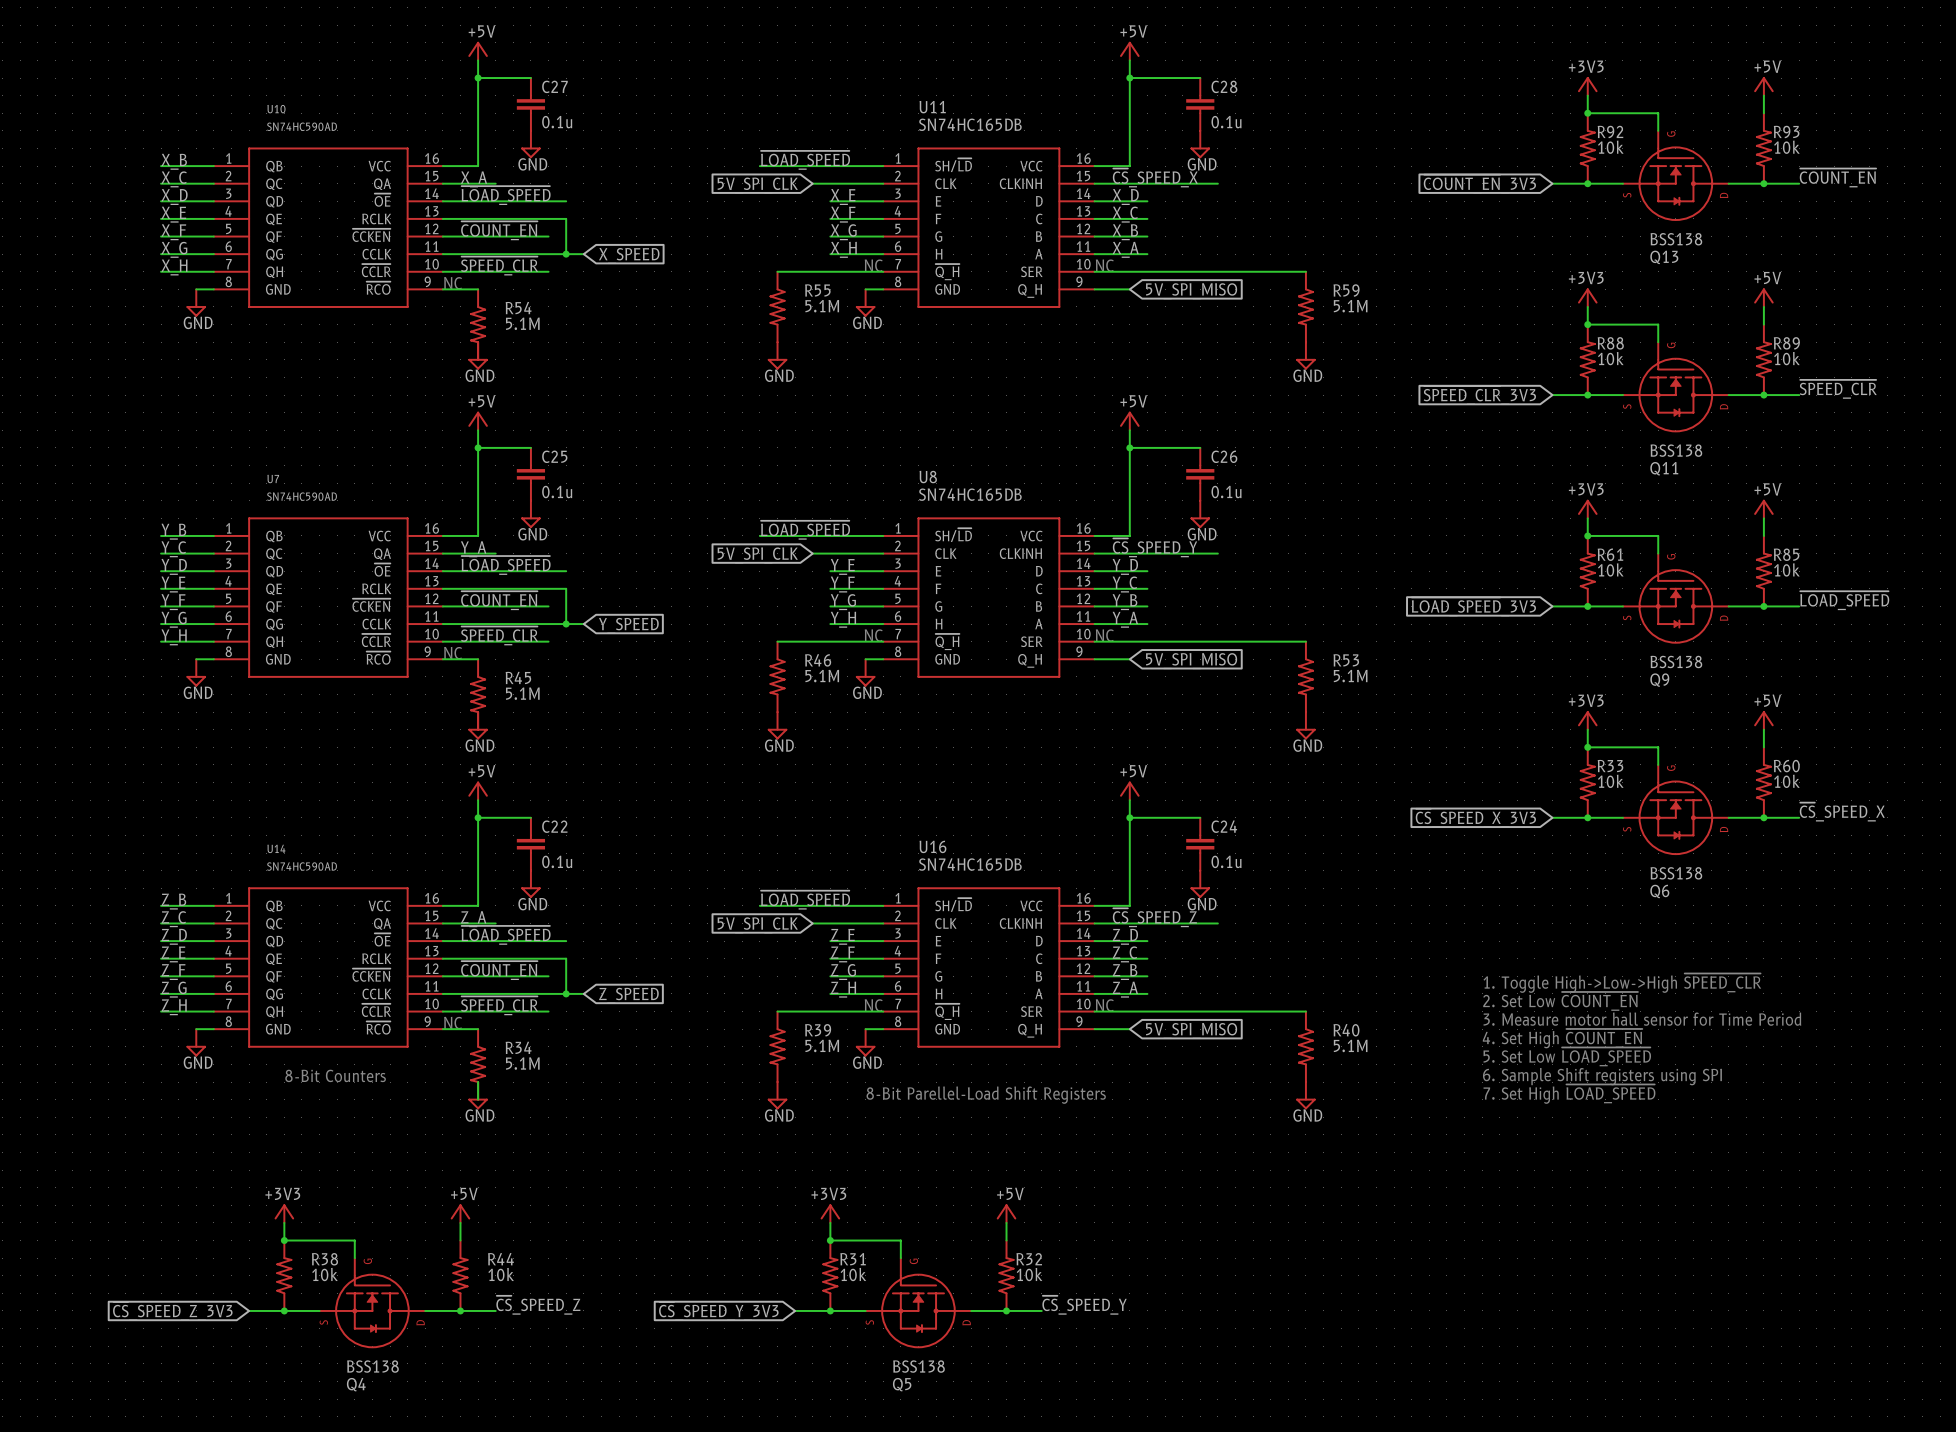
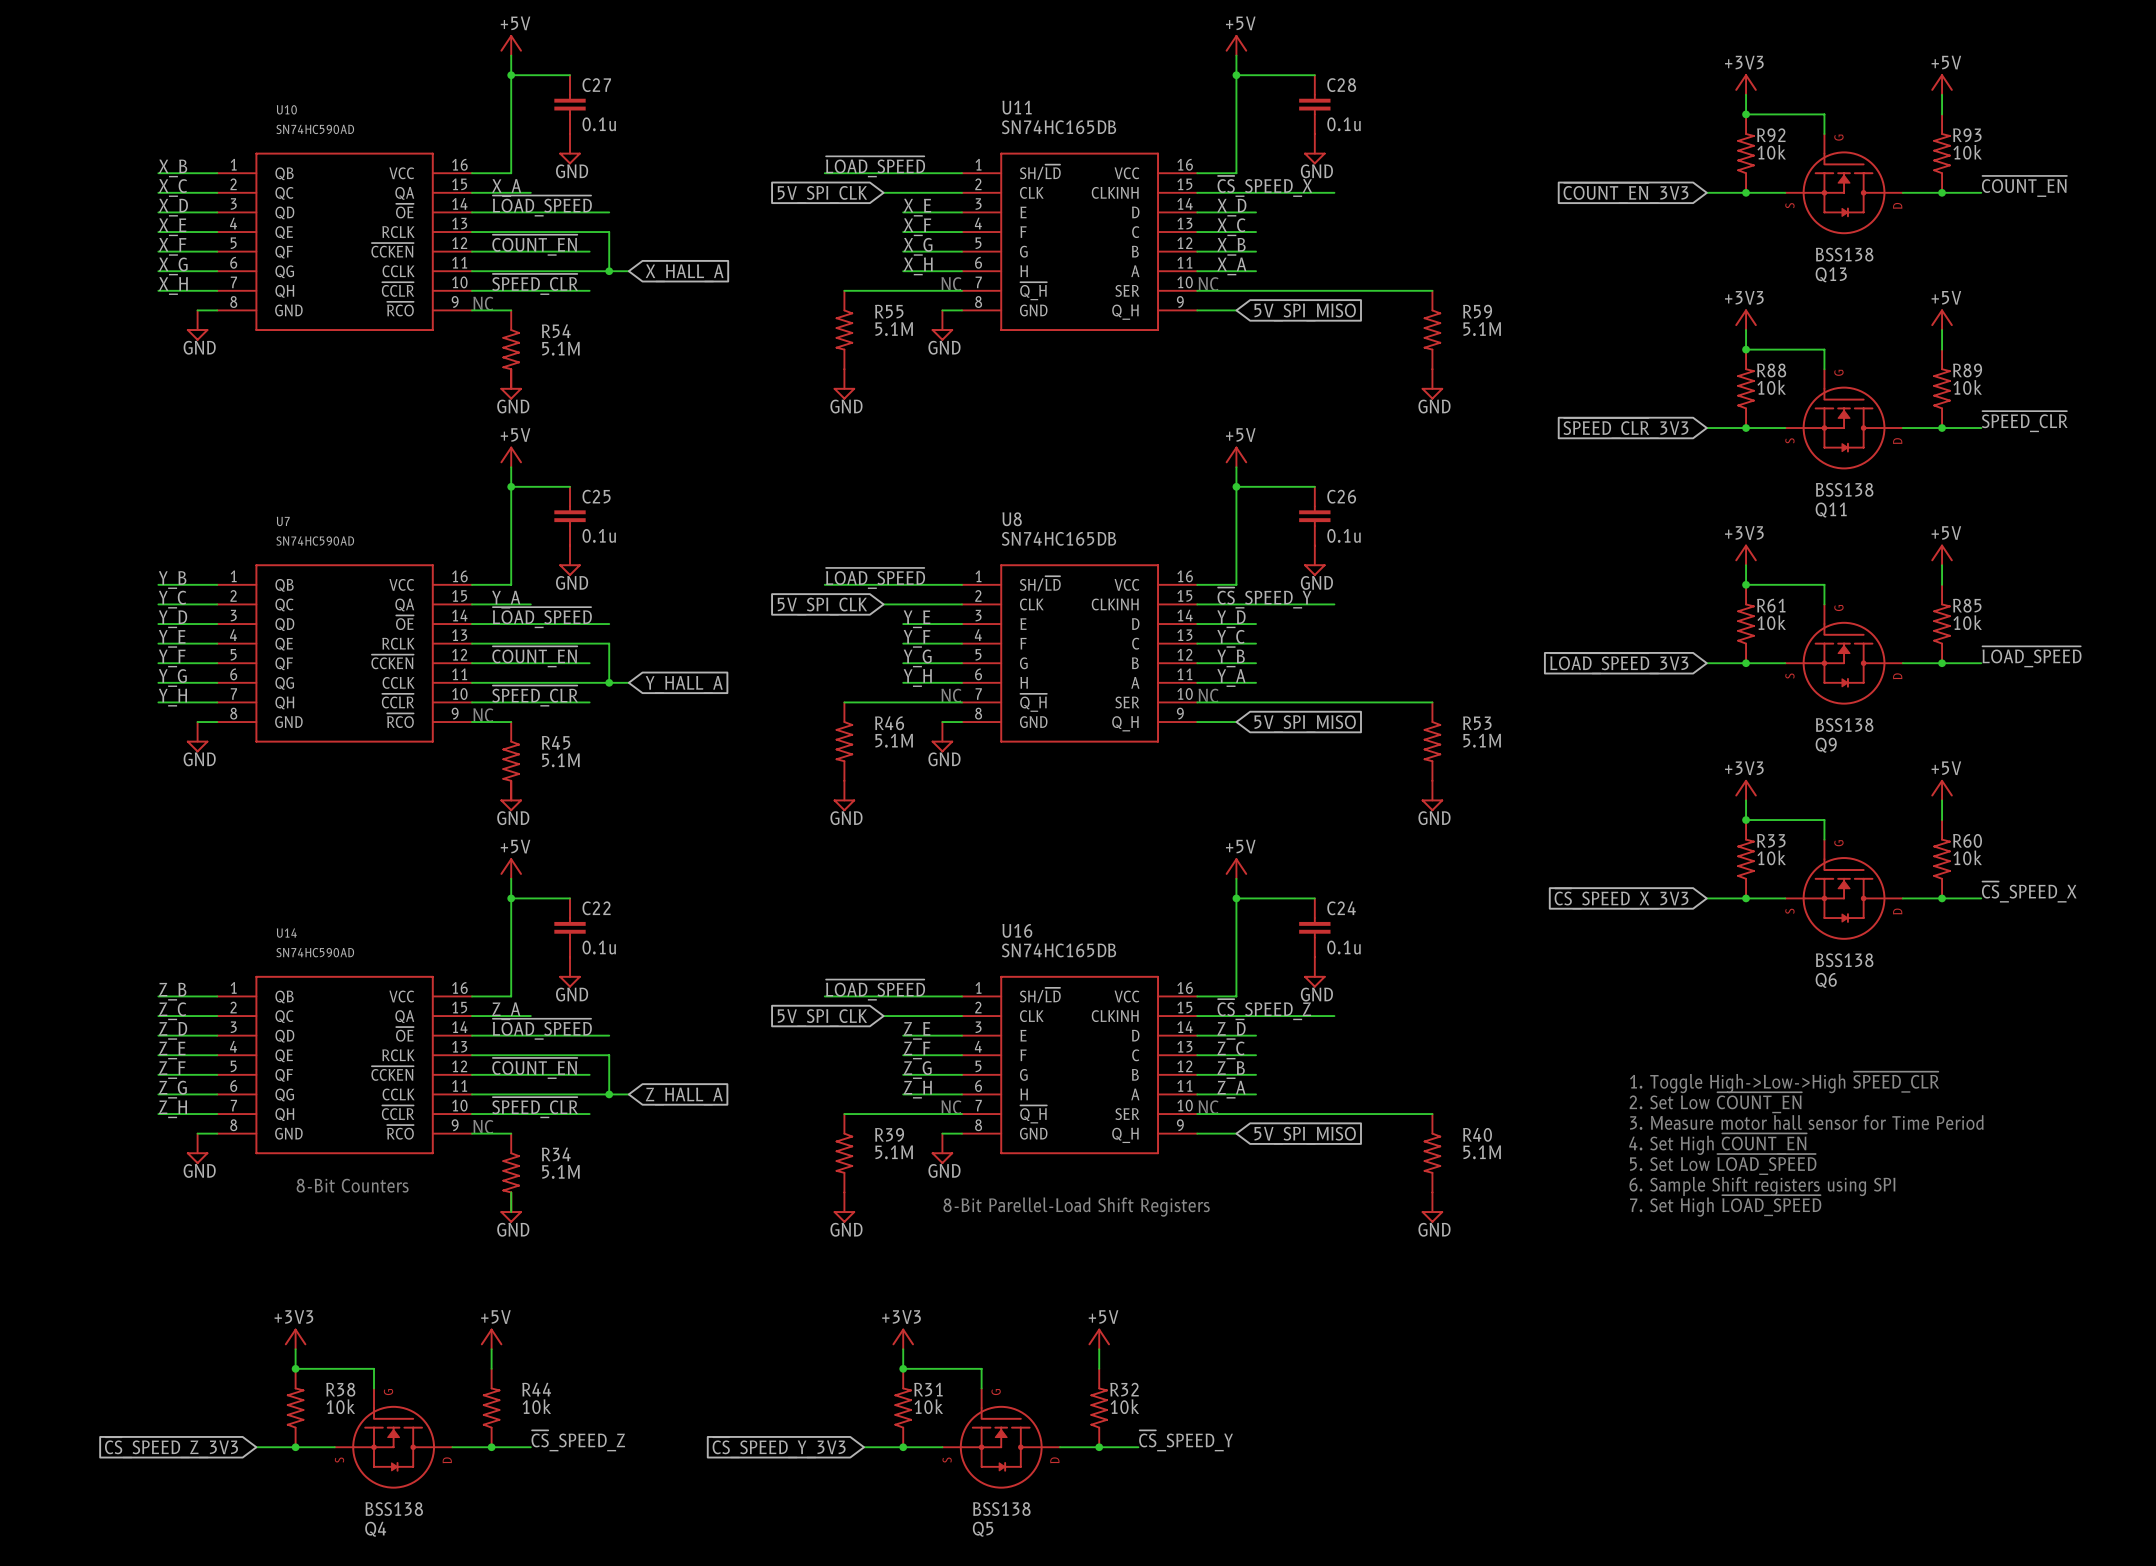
global label: X_SPEED (629, 256) -> X_HALL_A (684, 273)
global label: Y_SPEED (628, 625) -> Y_HALL_A (684, 684)
global label: Z_SPEED (628, 995) -> Z_HALL_A (684, 1096)

